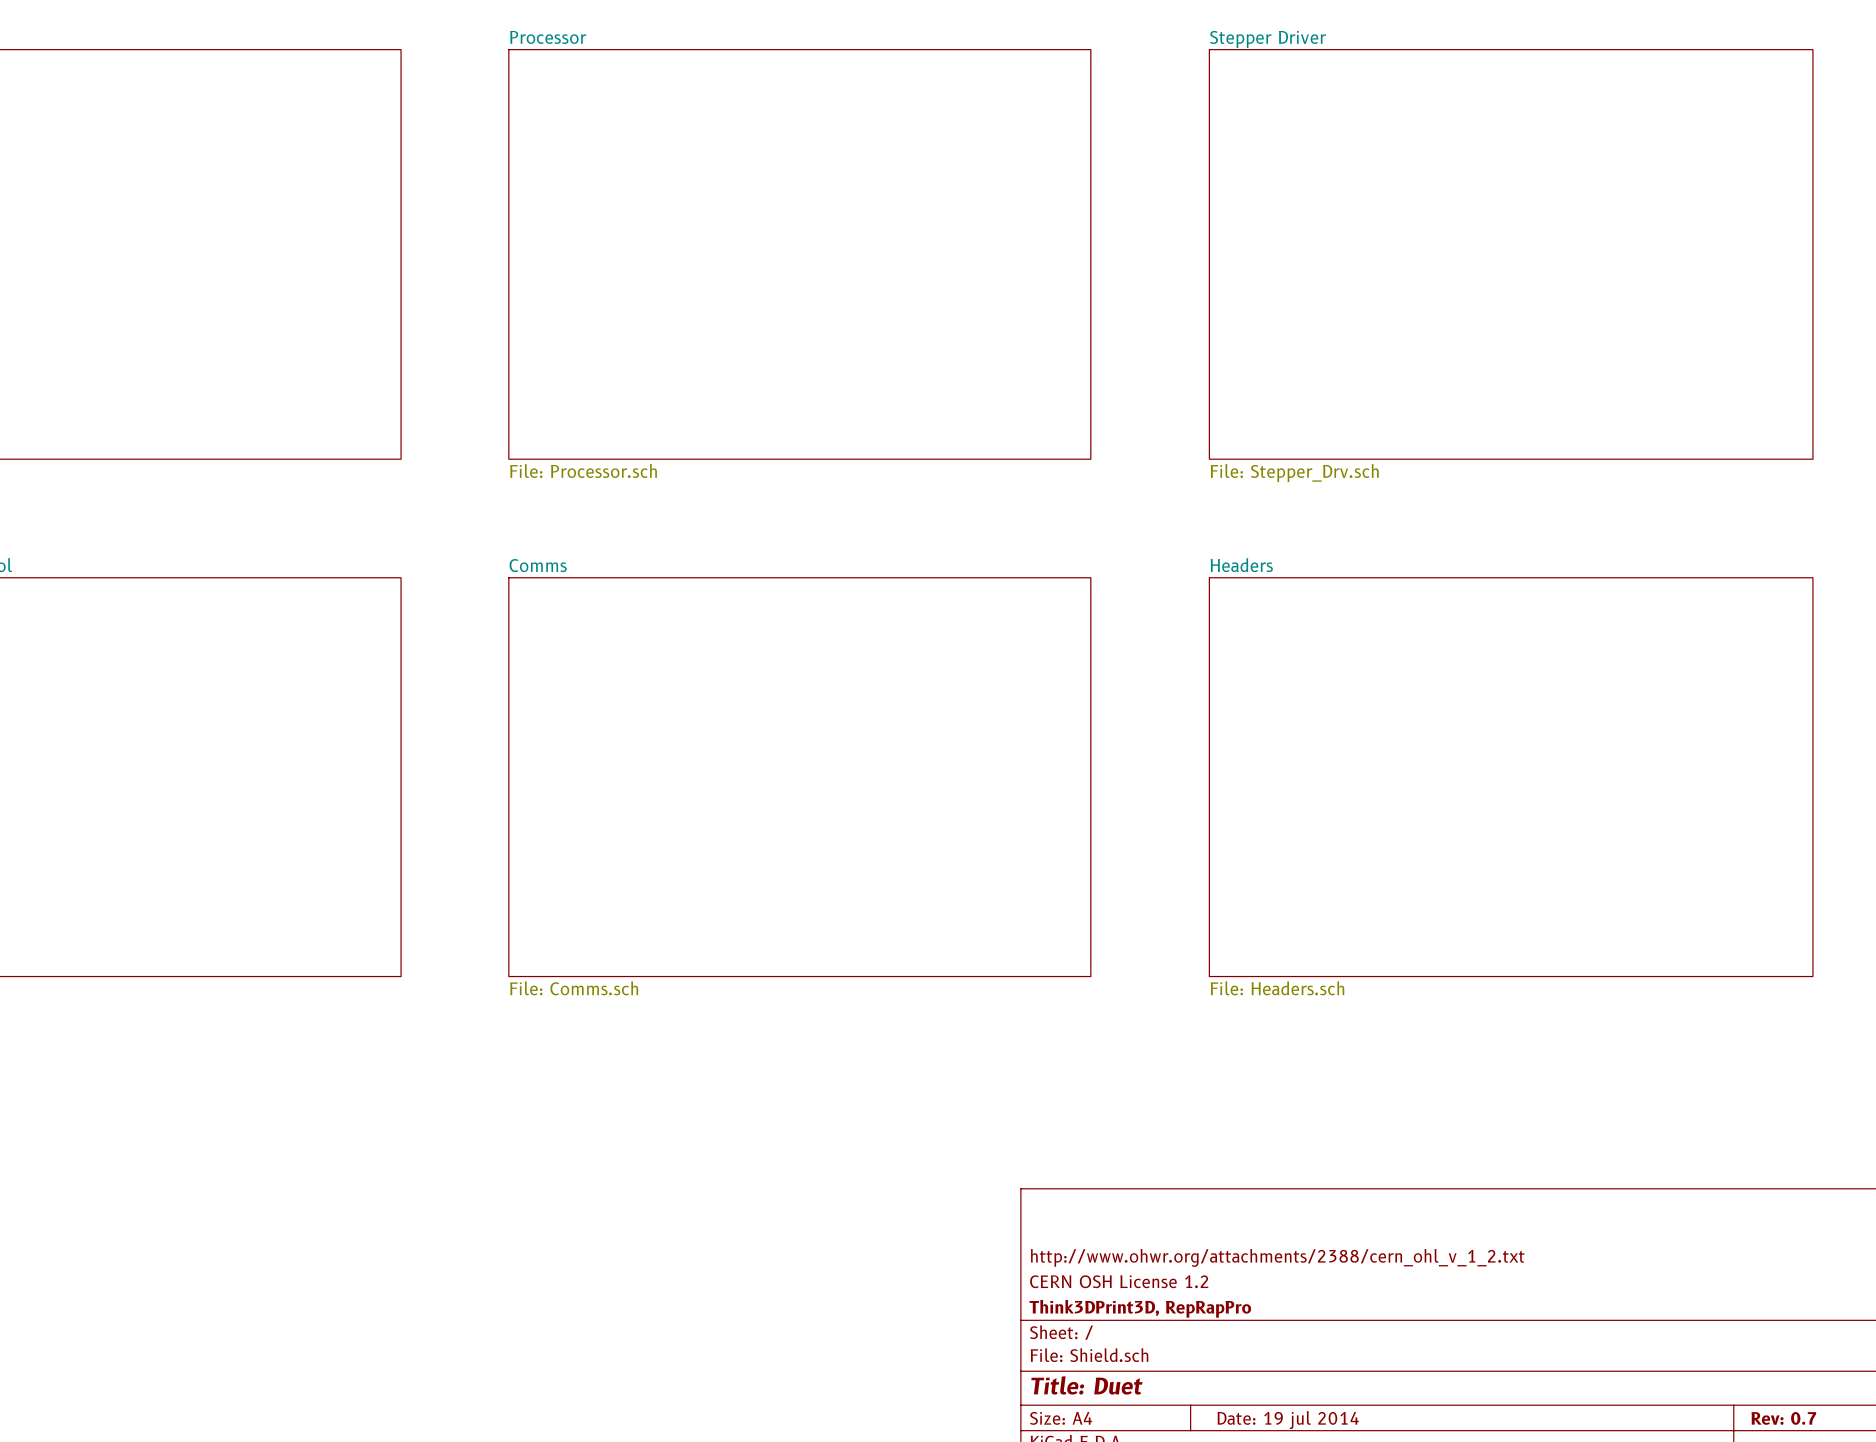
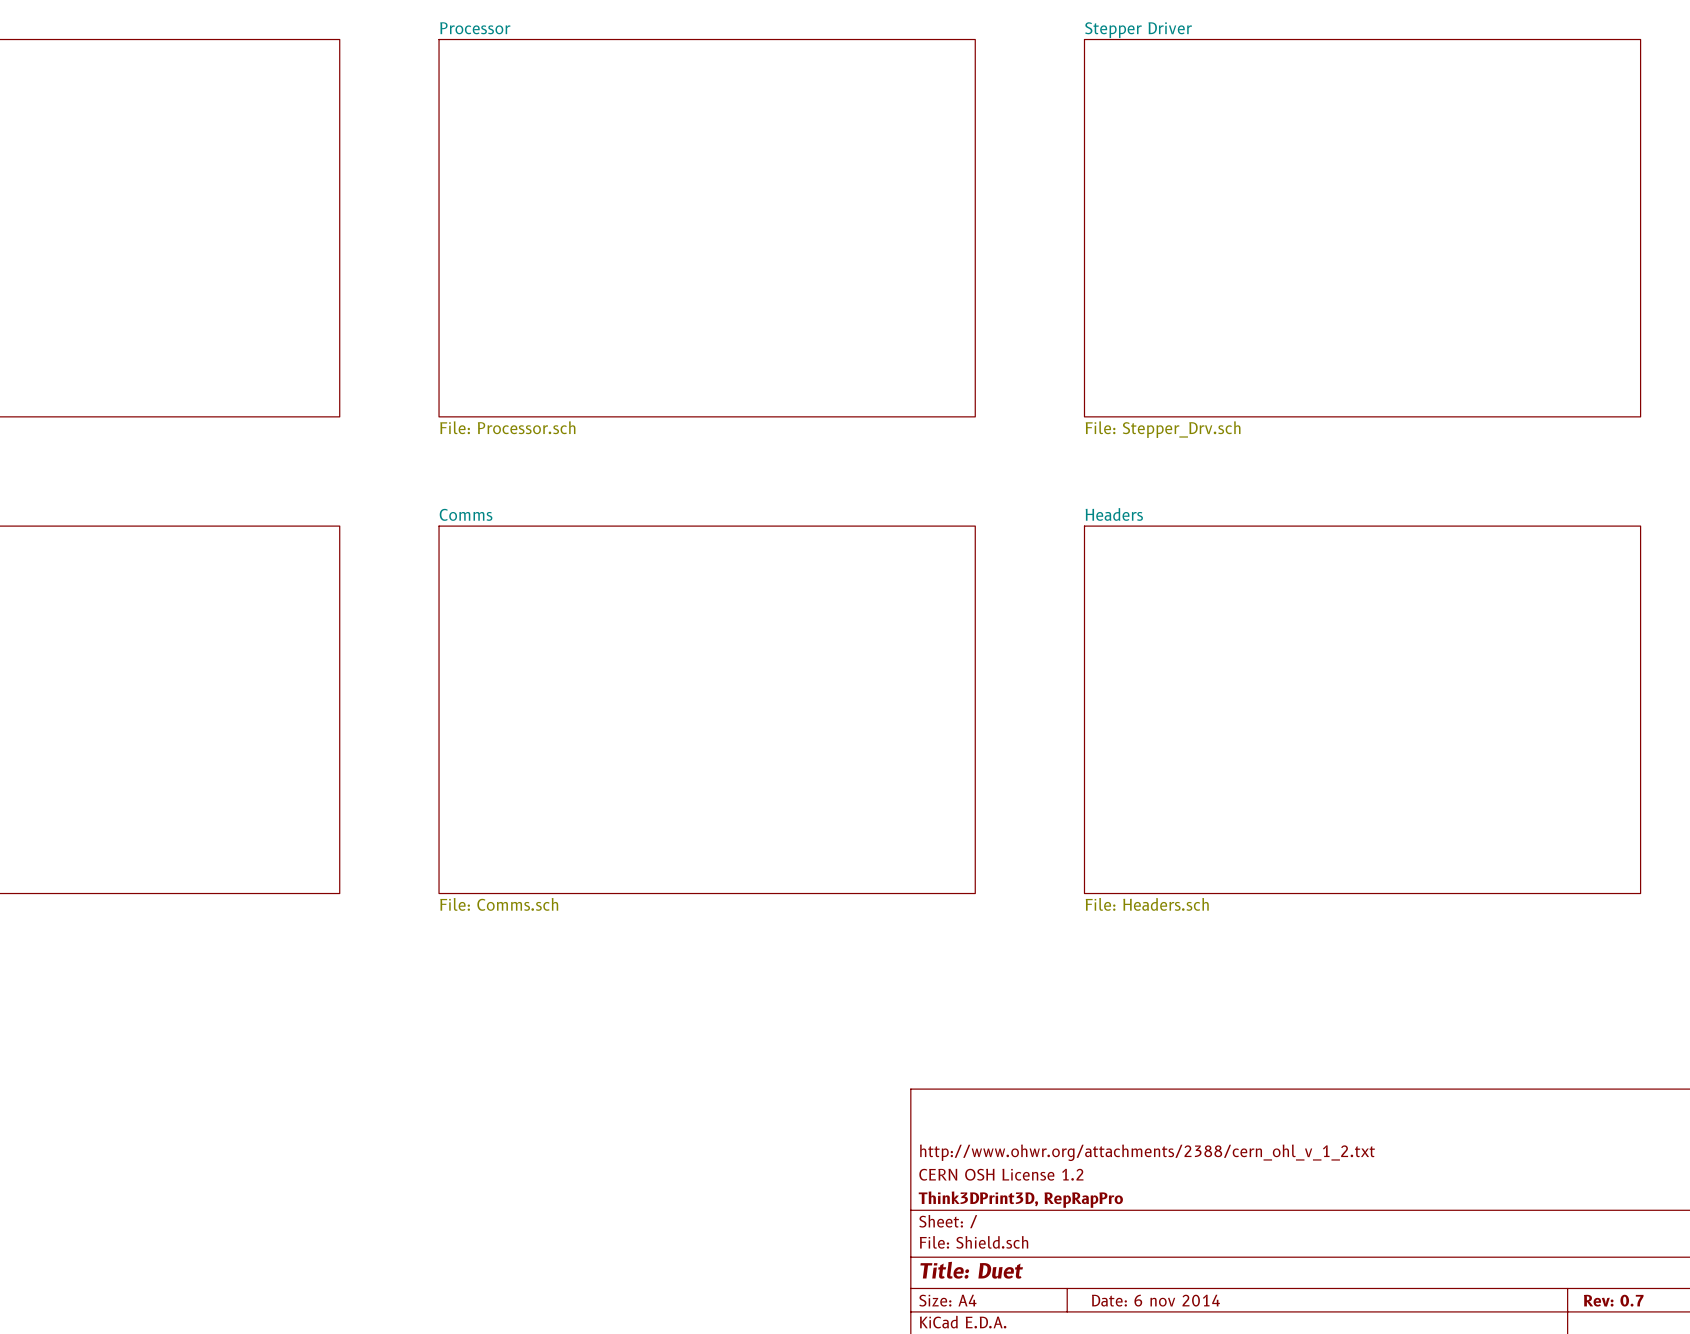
title block: Date: 19 jul 2014 (1288, 1420) -> Date: 6 nov 2014 (1155, 1300)

